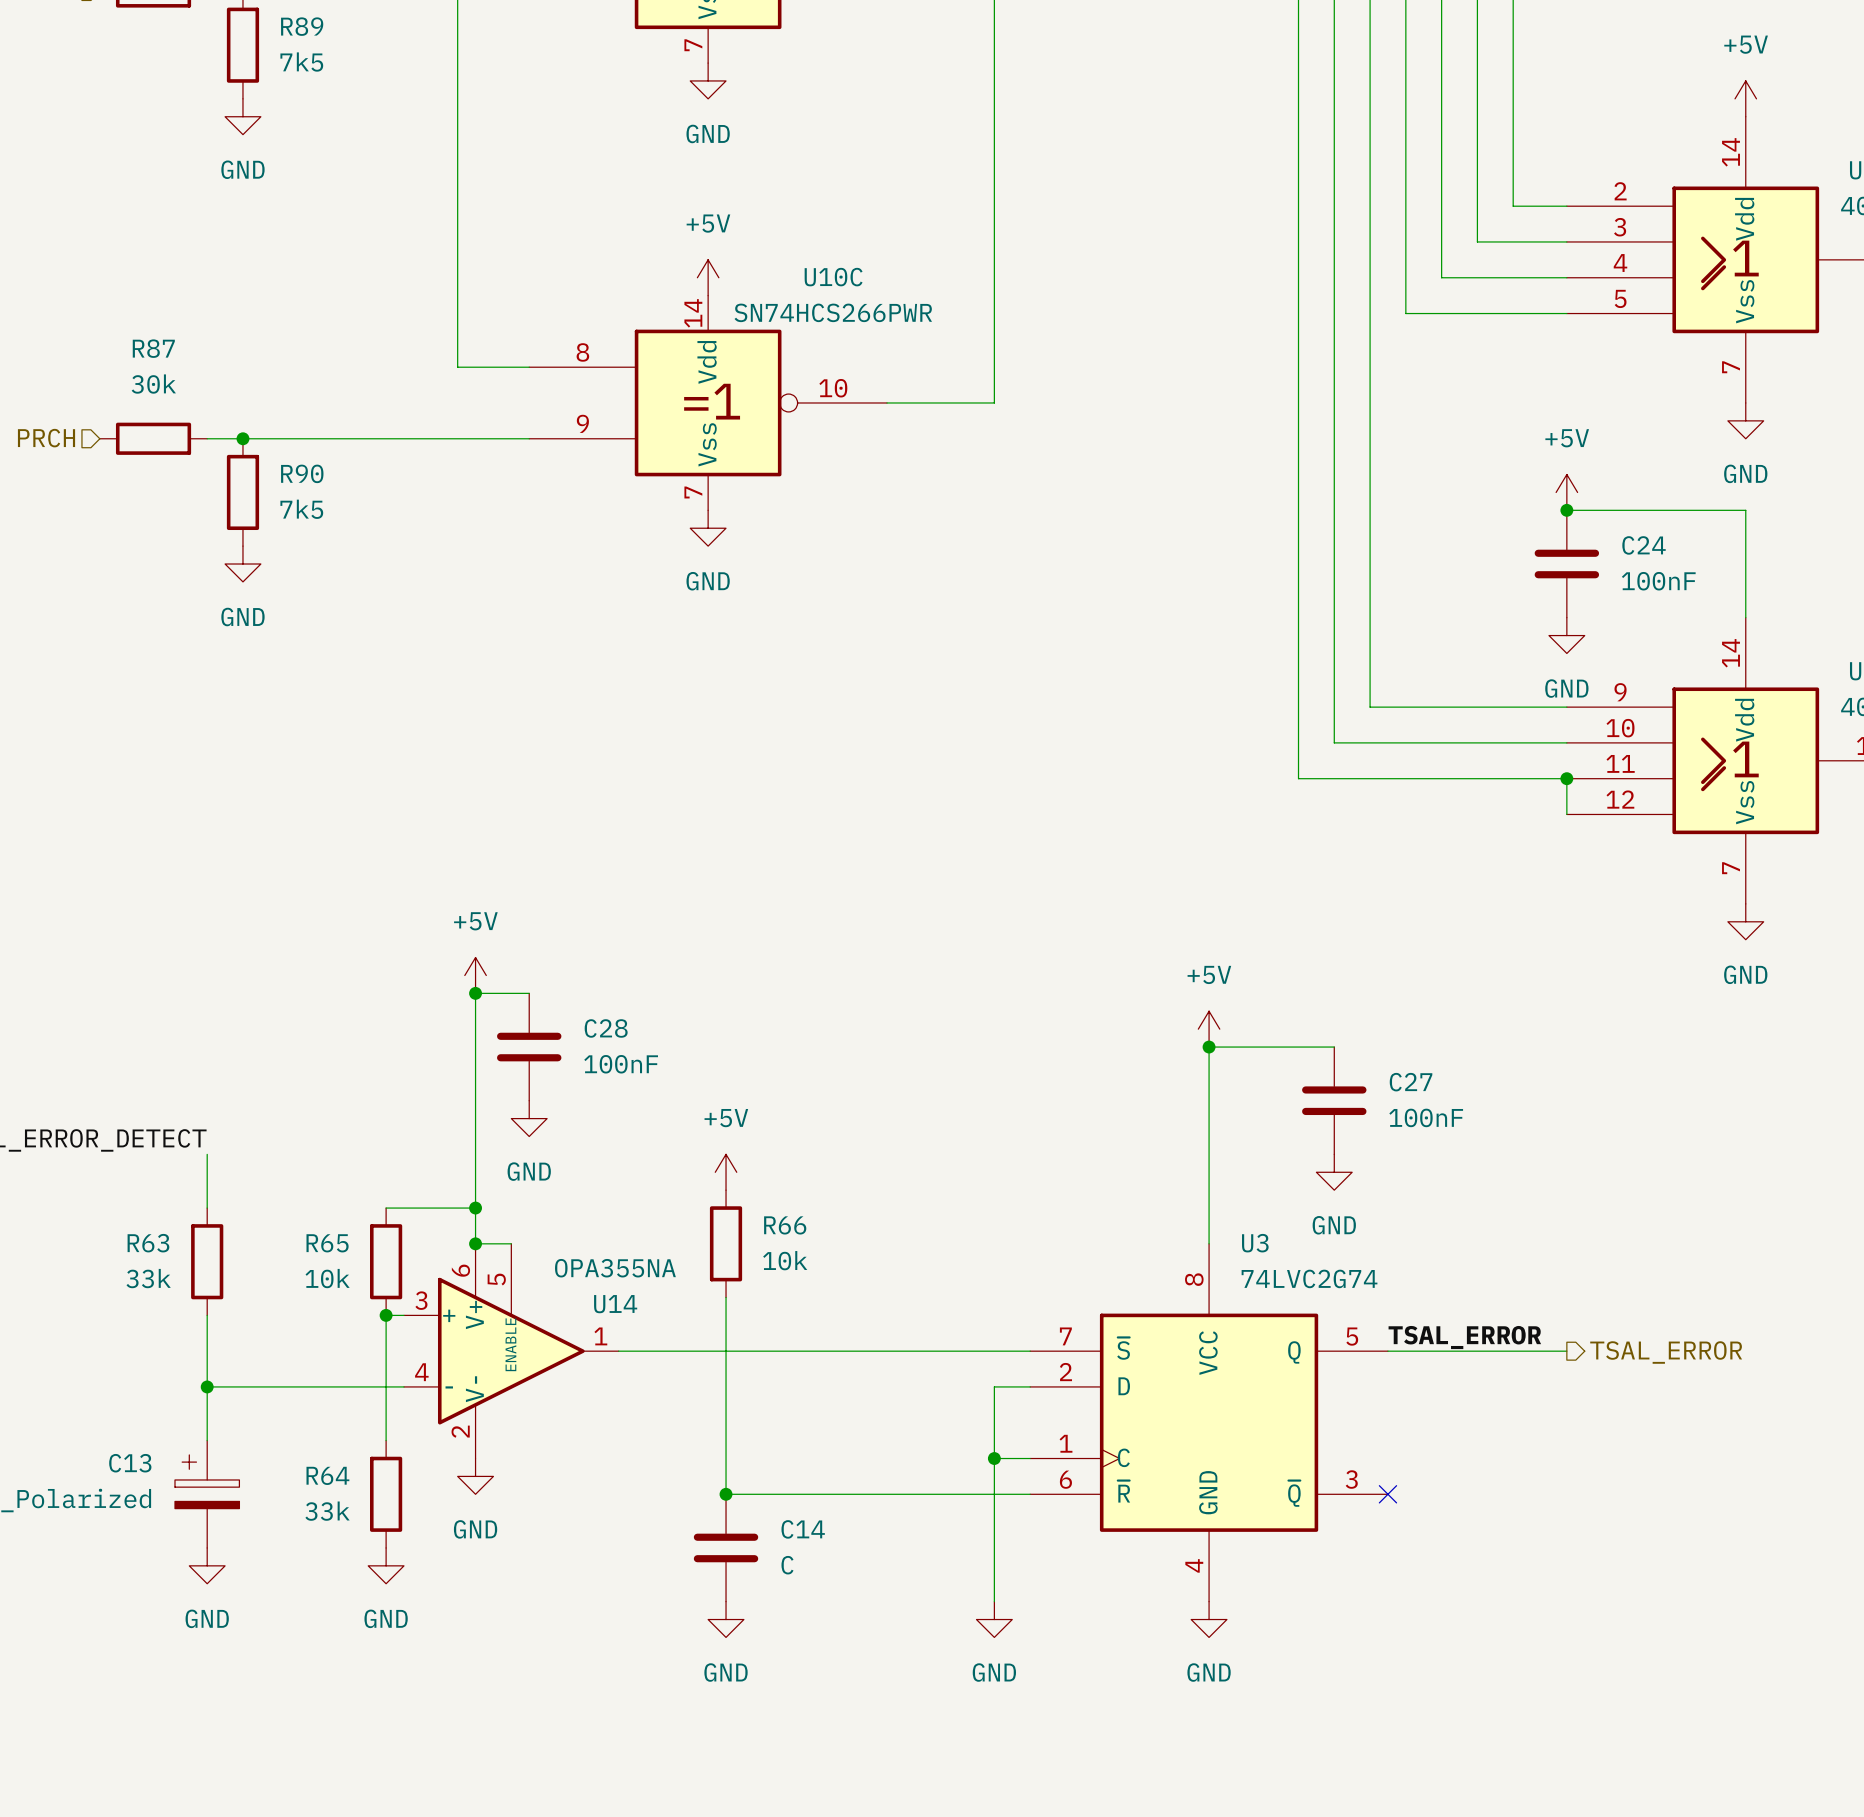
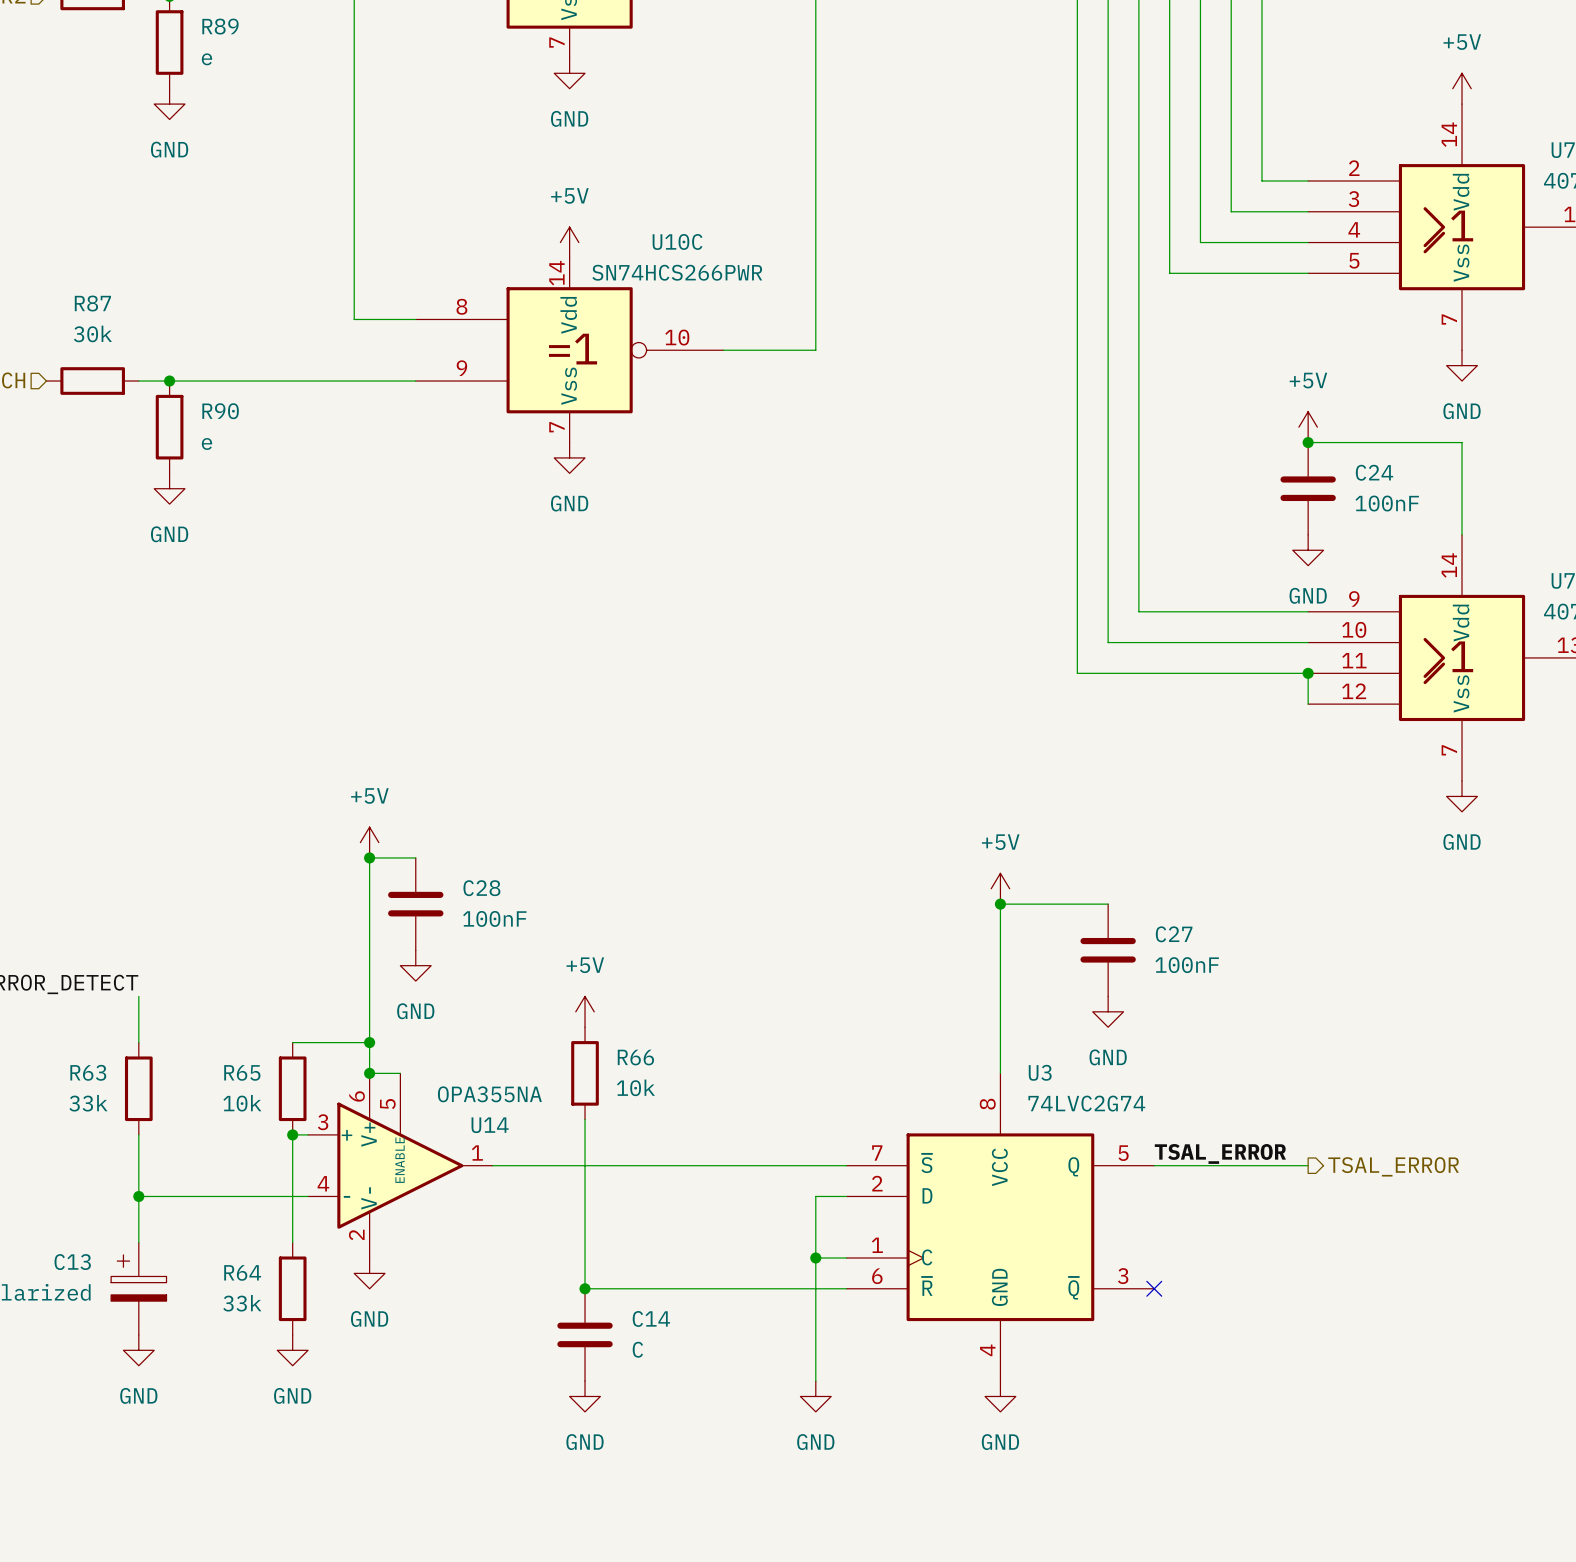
R89 value: 7k5 (301, 62) -> e (206, 59)
R90 value: 7k5 (301, 509) -> e (206, 443)

